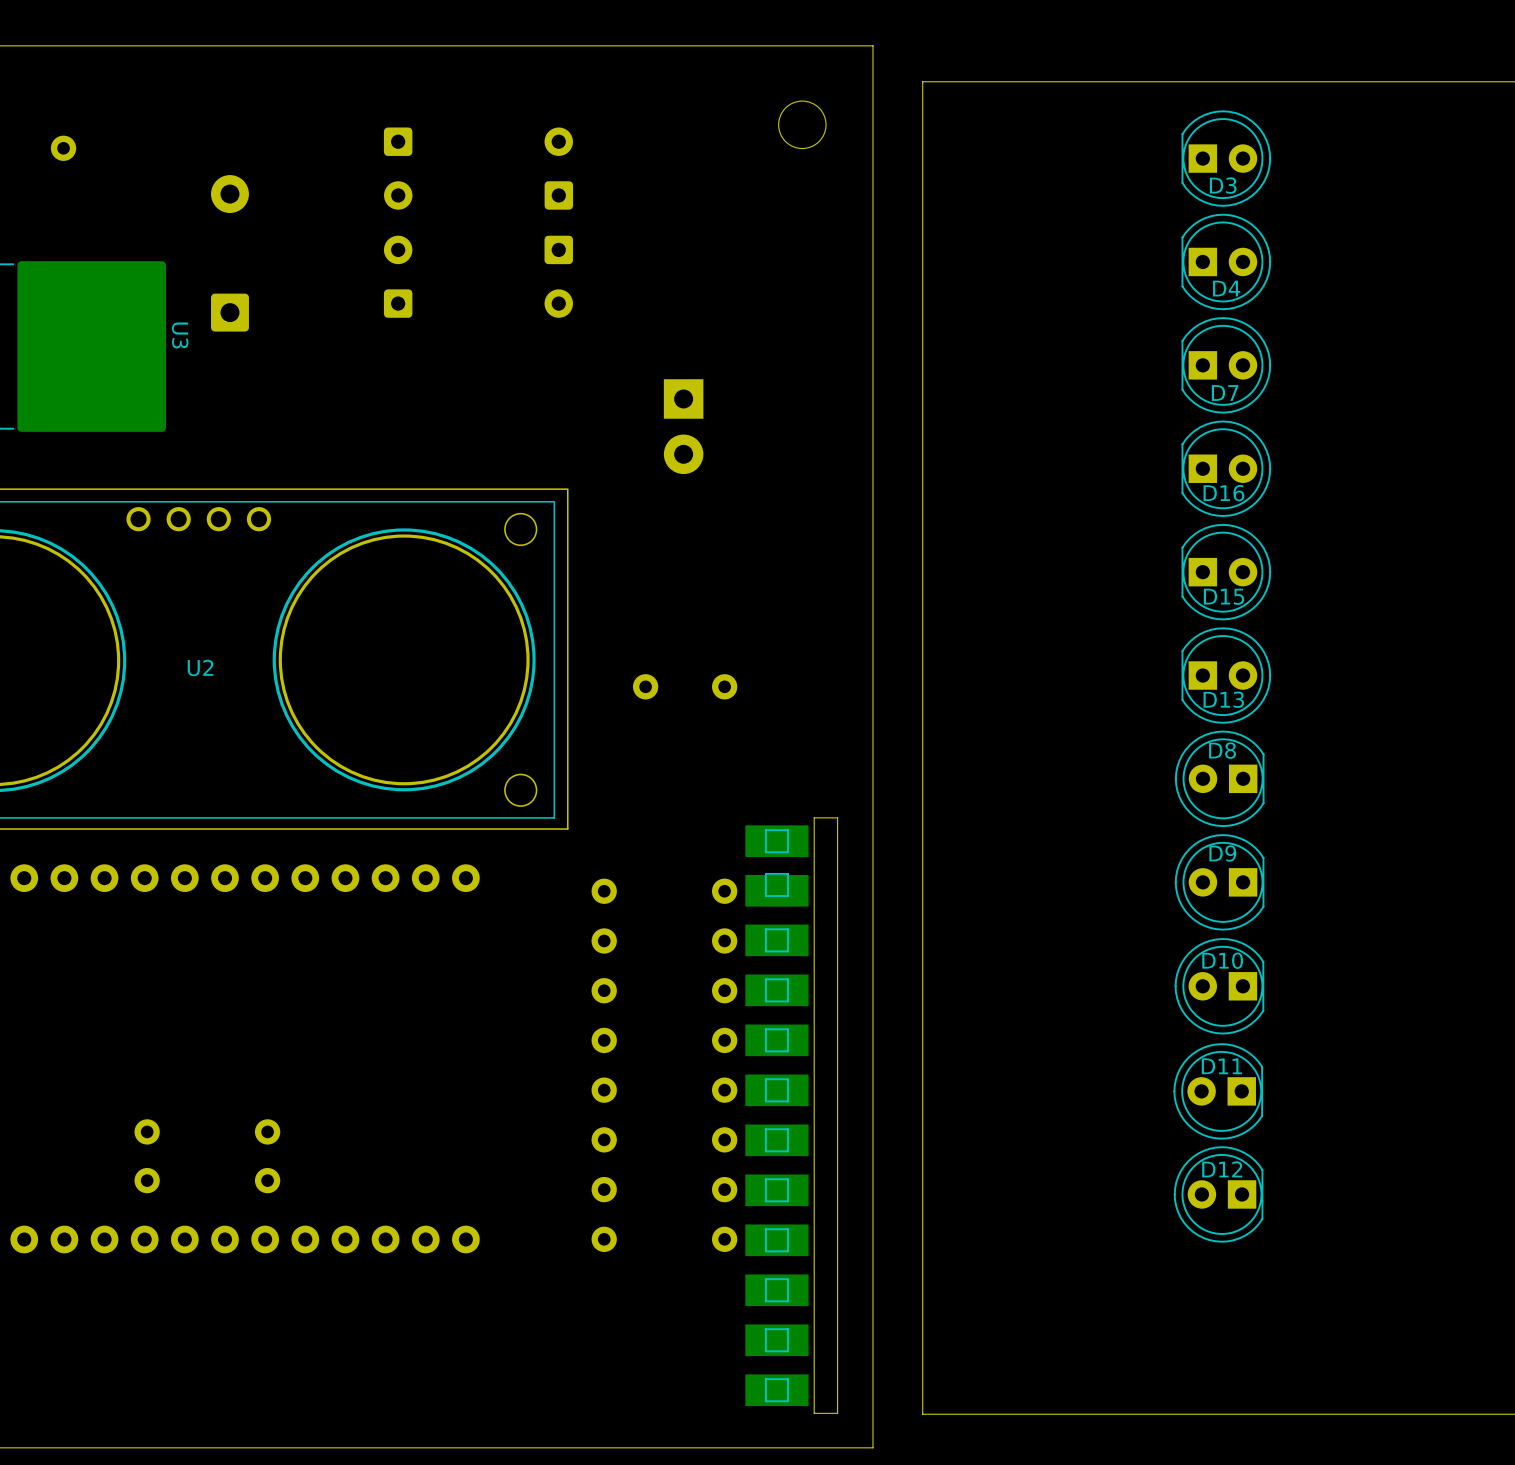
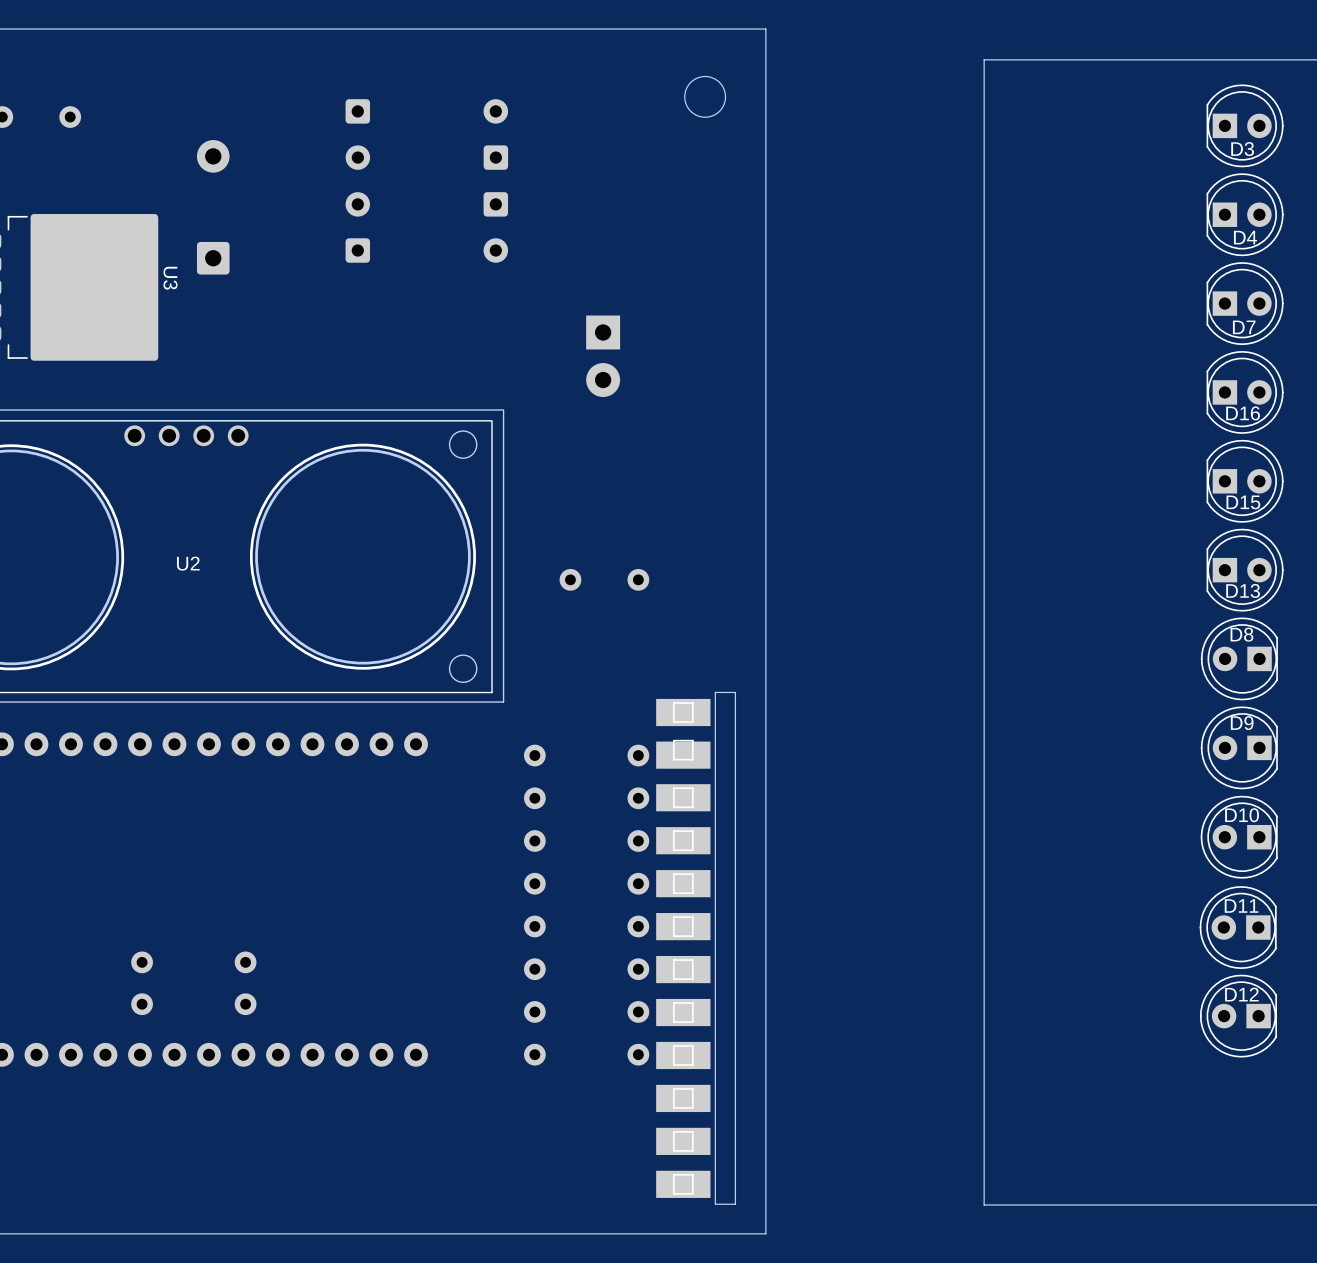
board edge: (1126, 81) (922, 81) (922, 1414) (1126, 1414) -> (984, 59) (984, 1204)
D3 position: (1226, 158) -> (1245, 125)
D4 position: (1226, 261) -> (1245, 214)
D7 position: (1226, 365) -> (1245, 303)
D16 position: (1226, 468) -> (1245, 392)
D15 position: (1226, 572) -> (1245, 481)
D13 position: (1226, 675) -> (1245, 570)
D8 position: (1219, 778) -> (1239, 658)
D9 position: (1219, 882) -> (1239, 747)
D10 position: (1219, 986) -> (1239, 837)
D11 position: (1218, 1091) -> (1238, 927)
D12 position: (1218, 1194) -> (1238, 1016)

